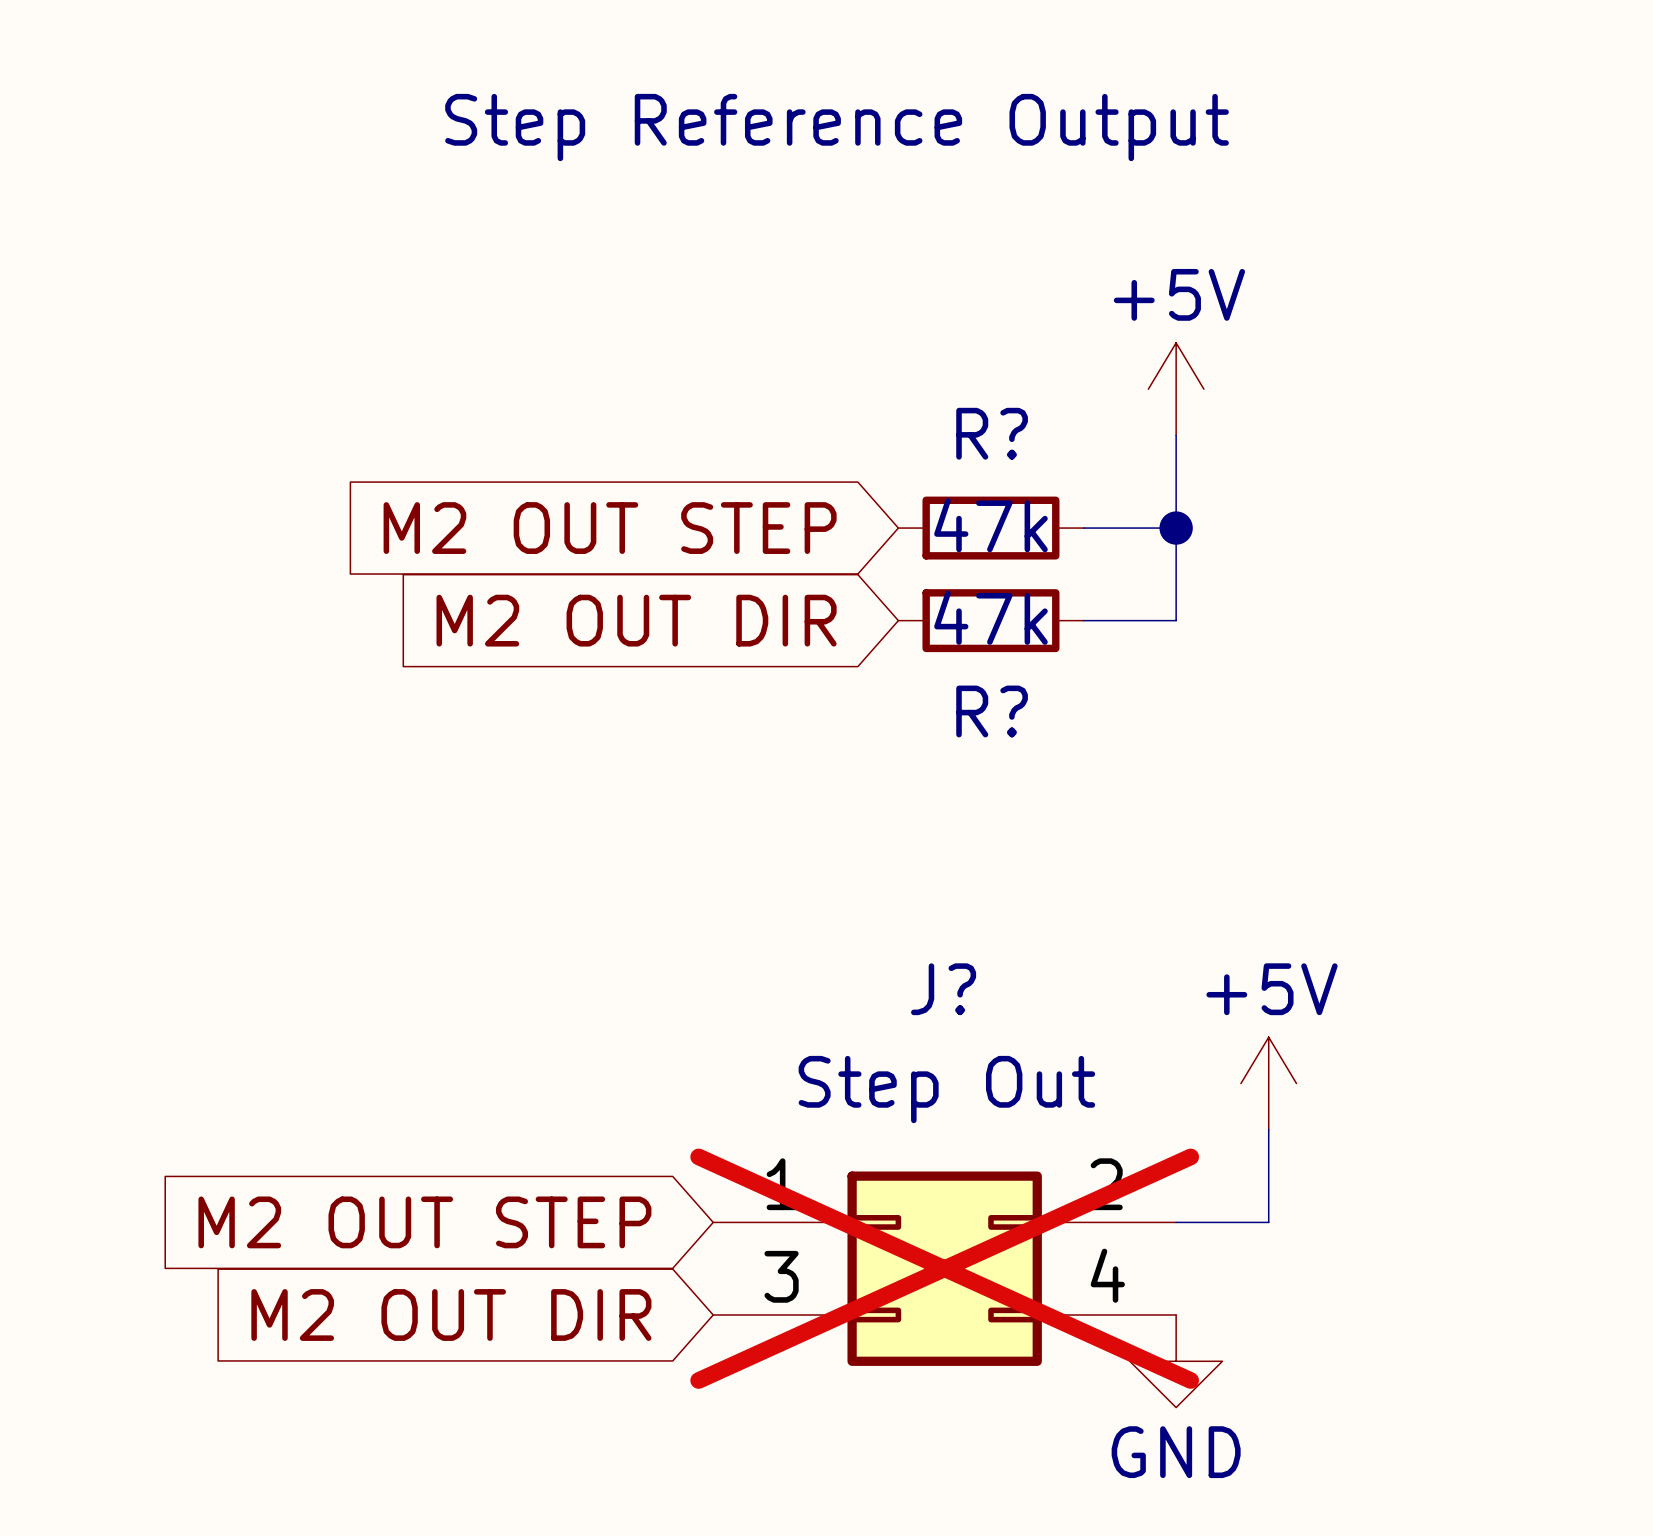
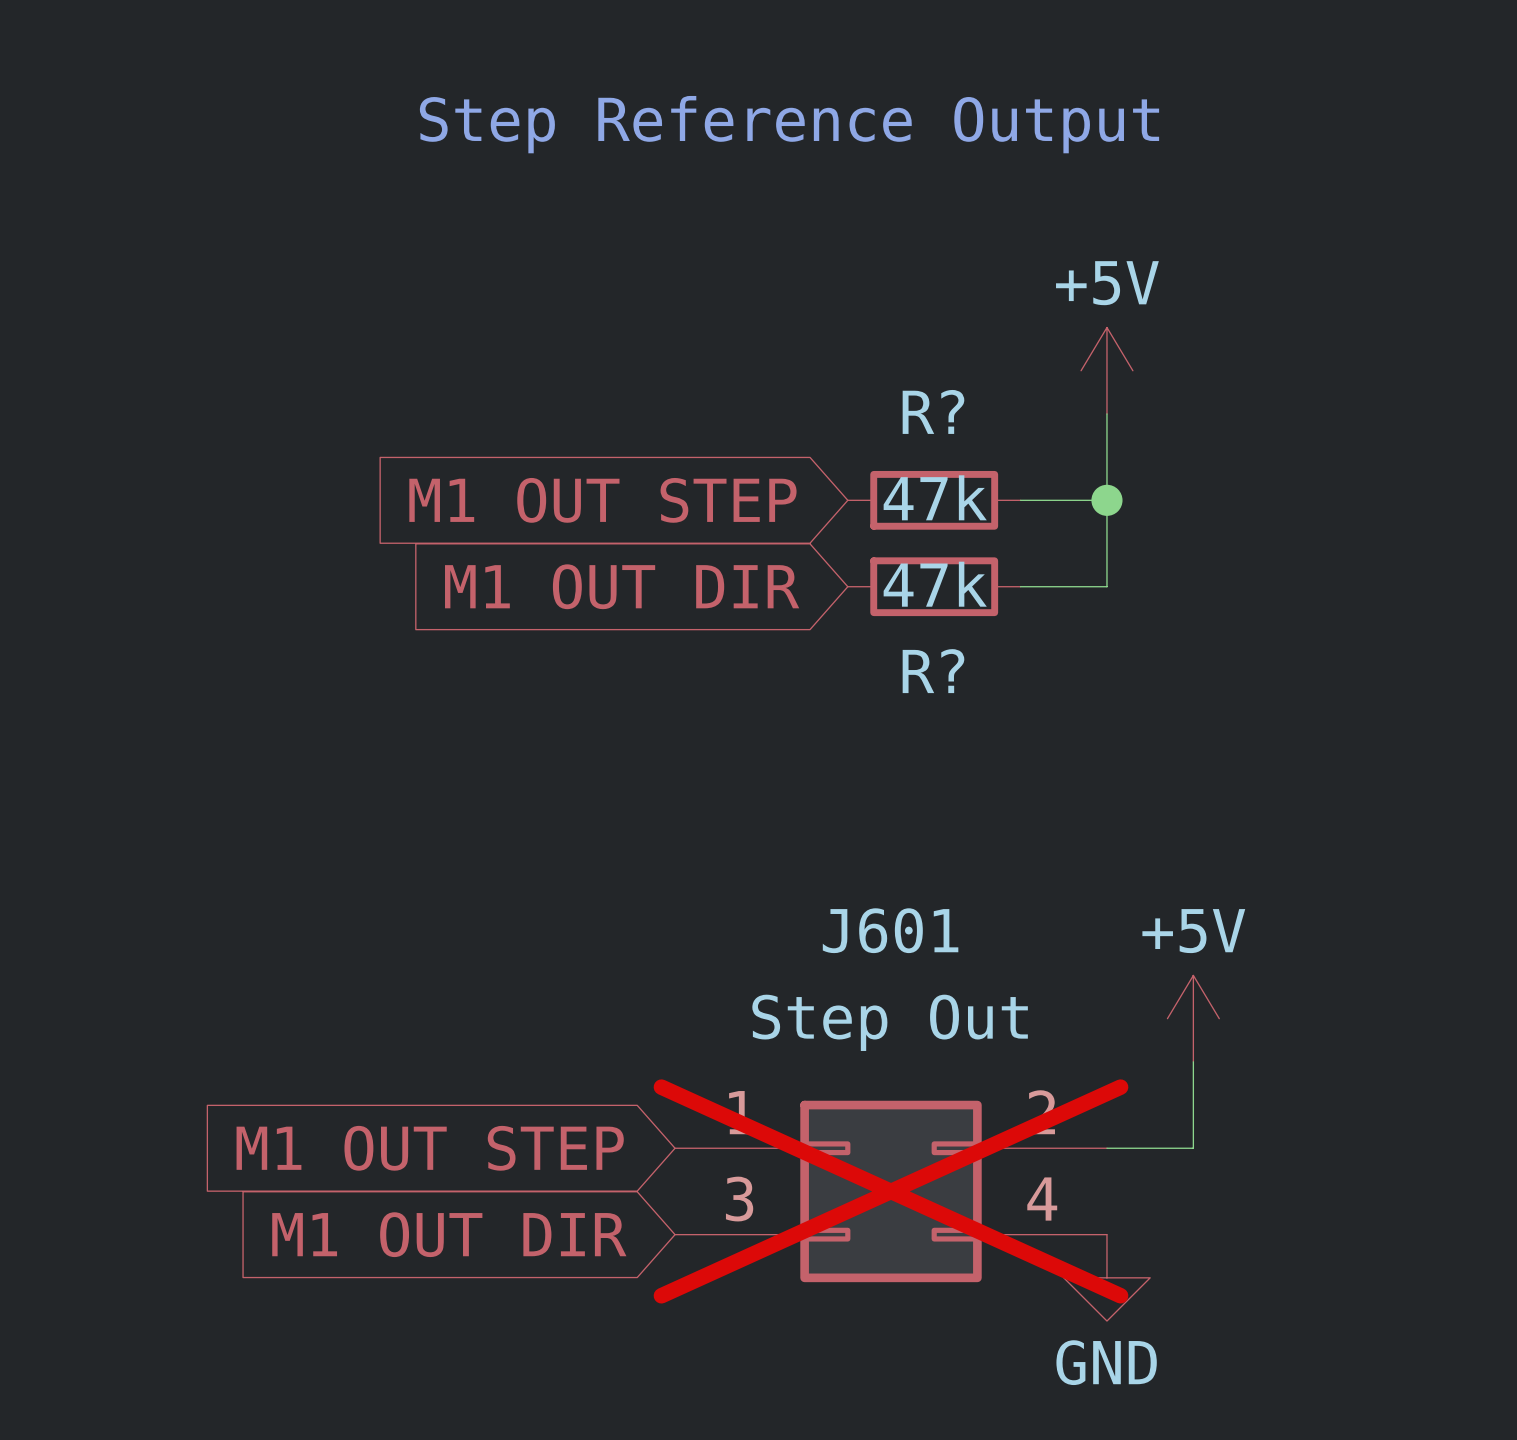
global label: M2 OUT STEP (610, 528) -> M1 OUT STEP (602, 500)
global label: M2 OUT DIR (636, 620) -> M1 OUT DIR (622, 586)
J? name: J? (943, 989) -> J601 (890, 930)
global label: M2 OUT STEP (424, 1222) -> M1 OUT STEP (430, 1148)
global label: M2 OUT DIR (451, 1315) -> M1 OUT DIR (449, 1234)

